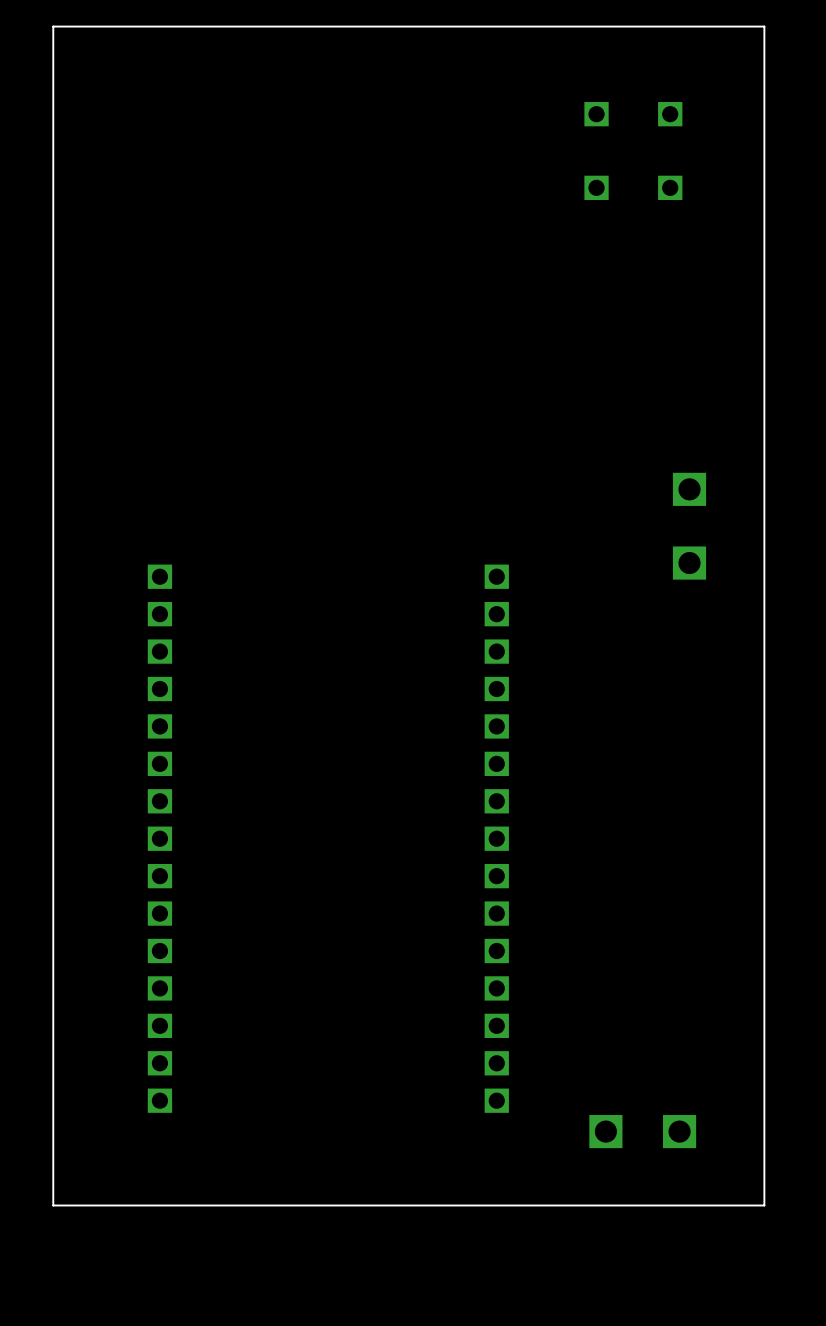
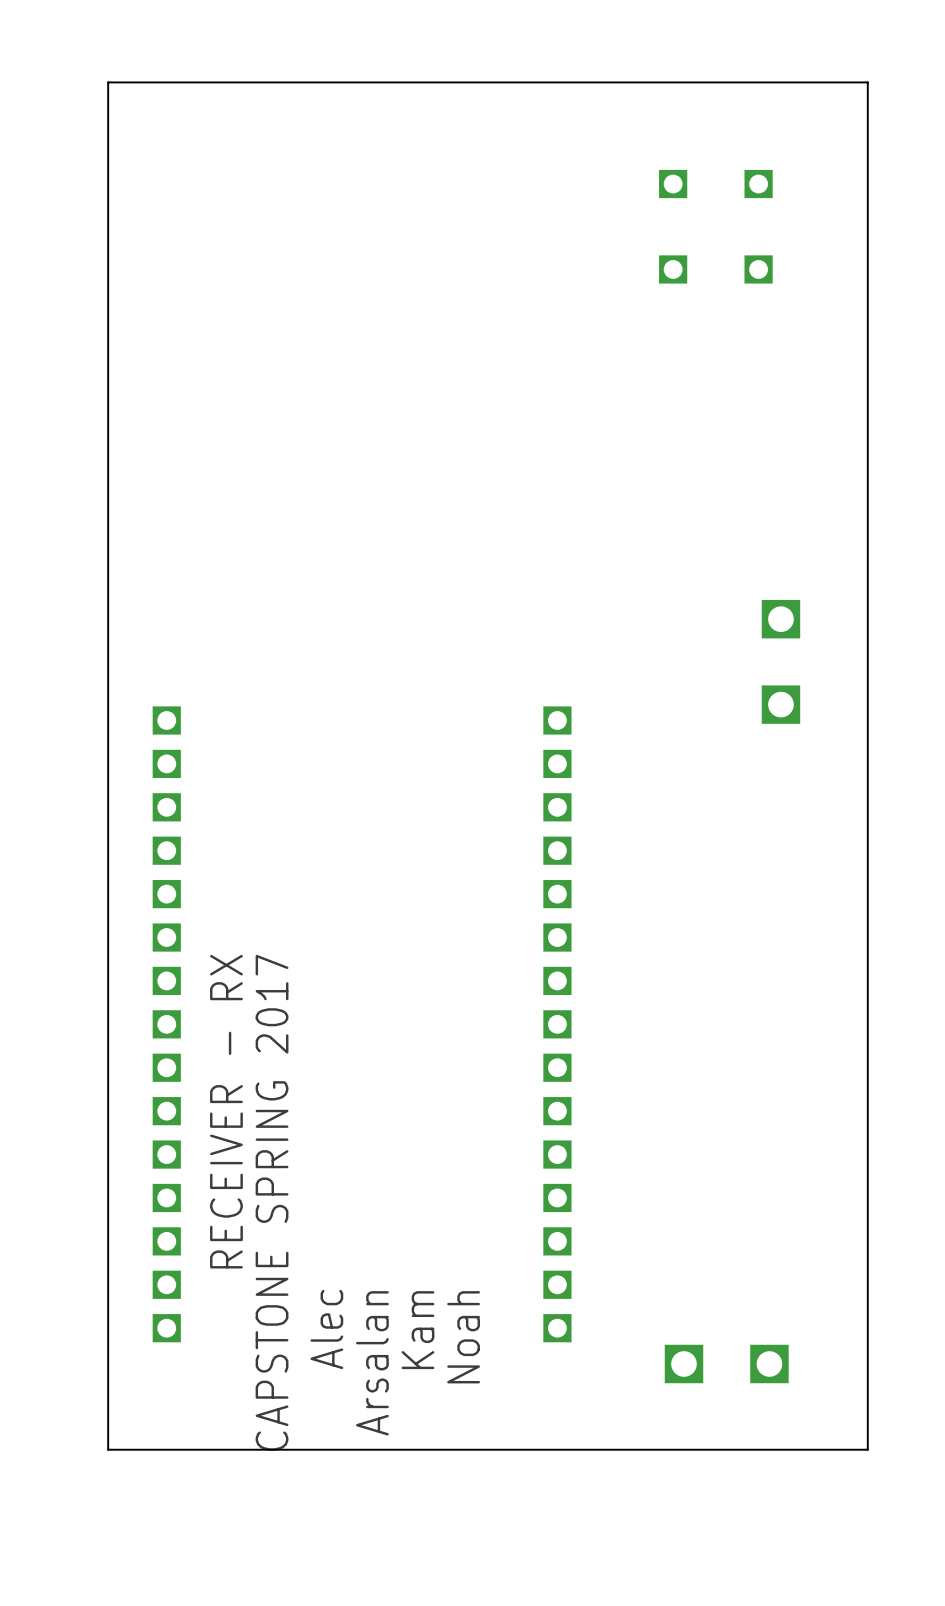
board edge: (109, 26) (53, 26) (53, 1205) (109, 1205) -> (108, 82) (108, 1449)
text: none -> RECEIVER - RX (226, 1111)
text: none -> CAPSTONE SPRING 2017 (272, 1202)
text: none -> Alec (326, 1329)
text: none -> Kam (417, 1330)
text: none -> Noah (463, 1337)
text: none -> Arsalan (372, 1363)

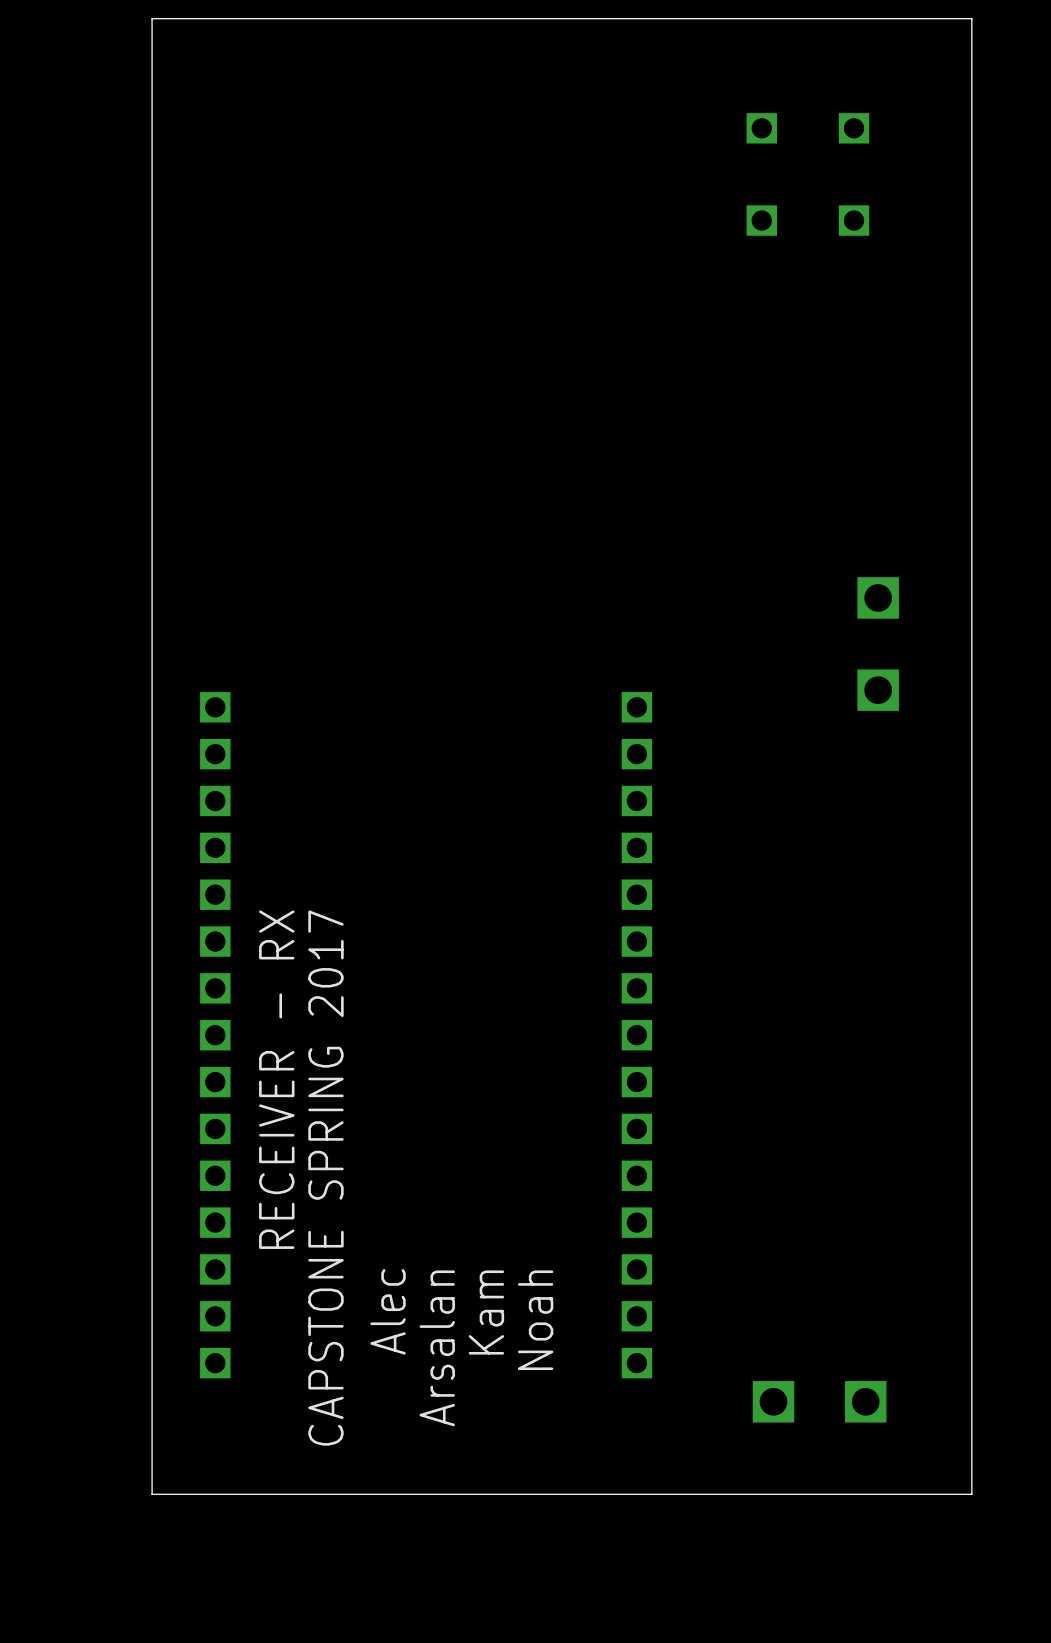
text position: RECEIVER - RX (226, 1111) -> RECEIVER - RX (276, 1079)
text position: CAPSTONE SPRING 2017 (272, 1202) -> CAPSTONE SPRING 2017 (325, 1178)
text position: Alec (326, 1329) -> Alec (388, 1311)
text position: Kam (417, 1330) -> Kam (486, 1312)
text position: Noah (463, 1337) -> Noah (535, 1320)
text position: Arsalan (372, 1363) -> Arsalan (437, 1348)

